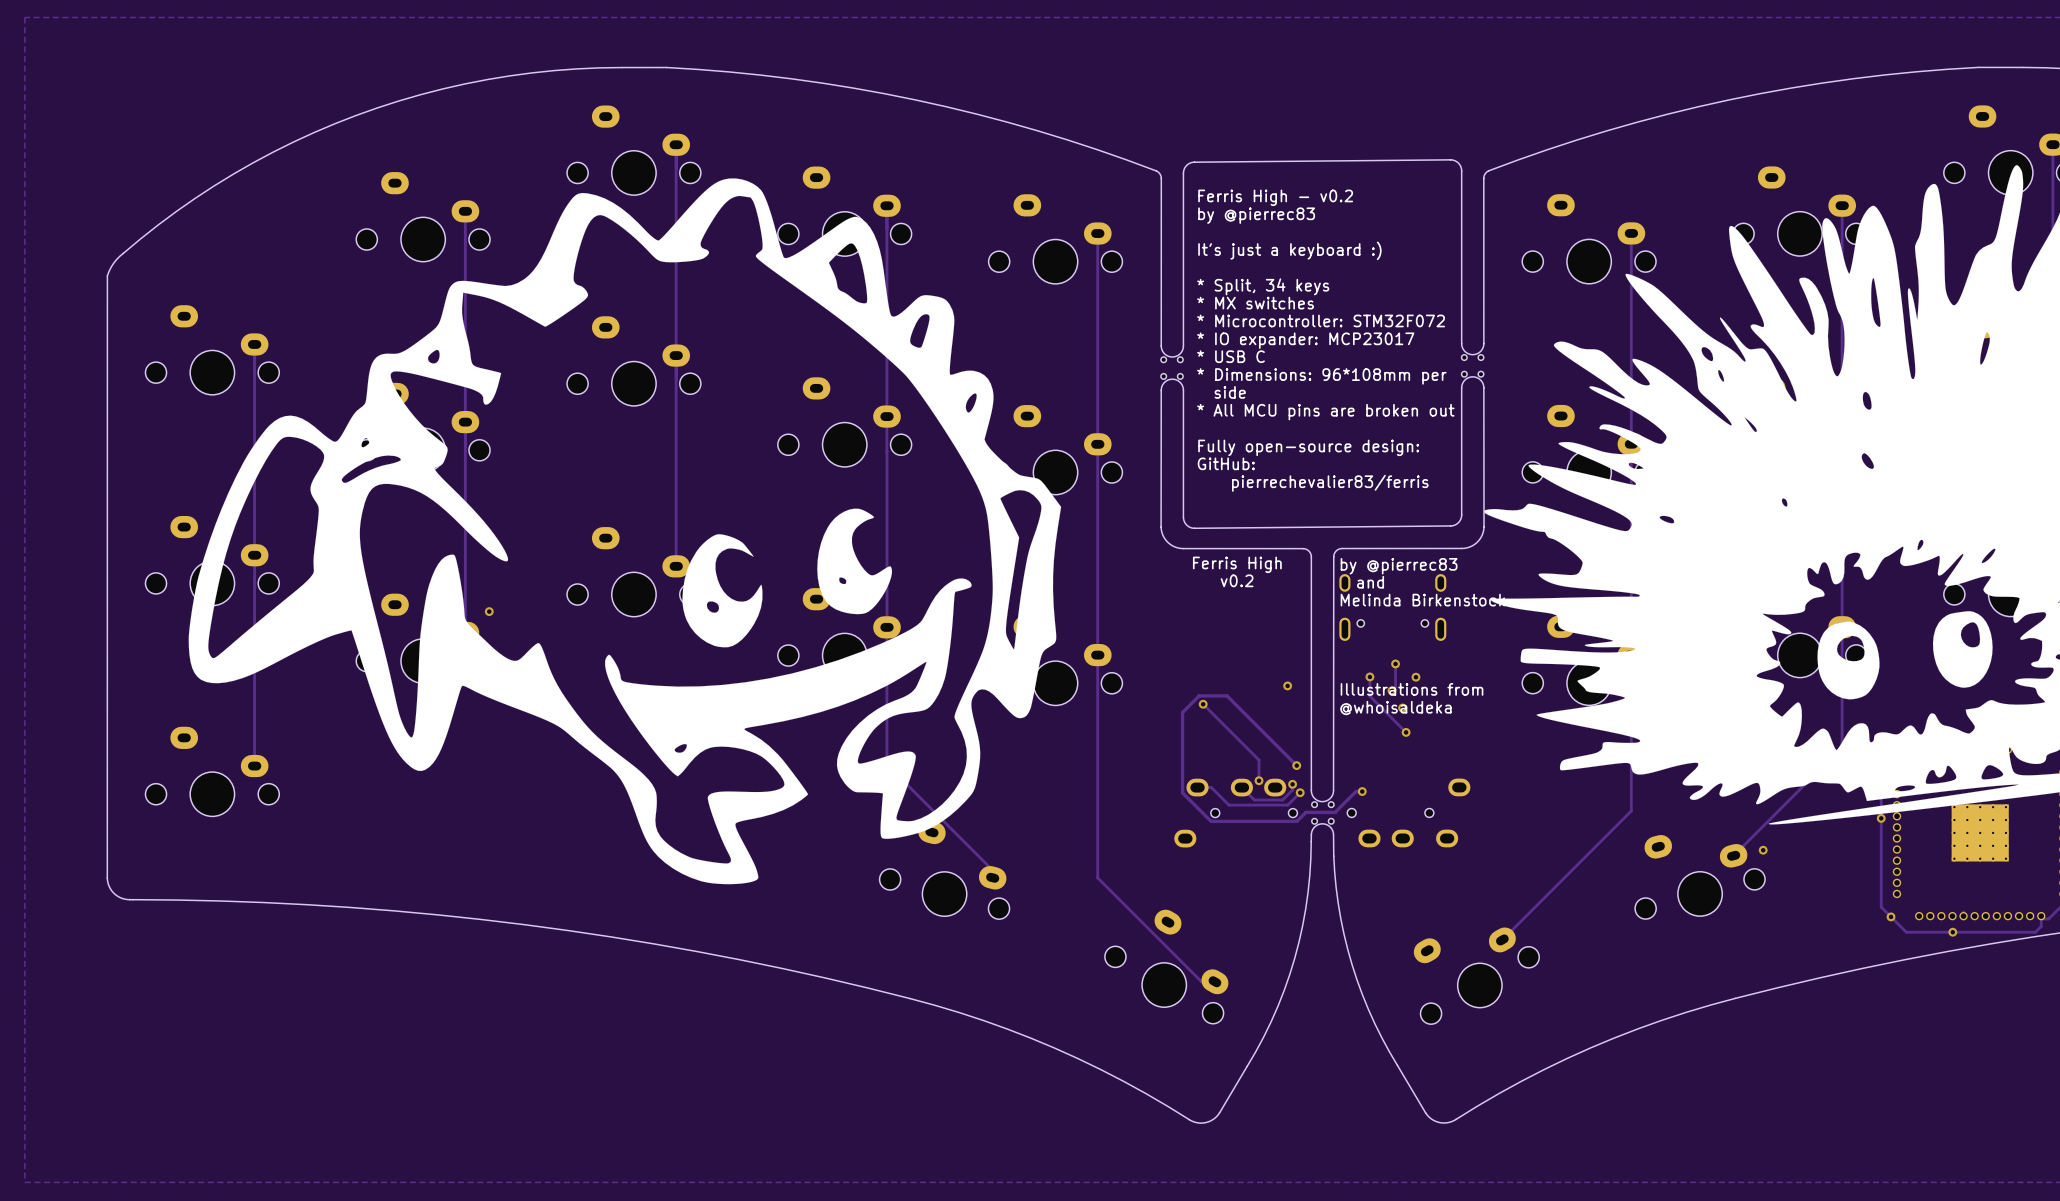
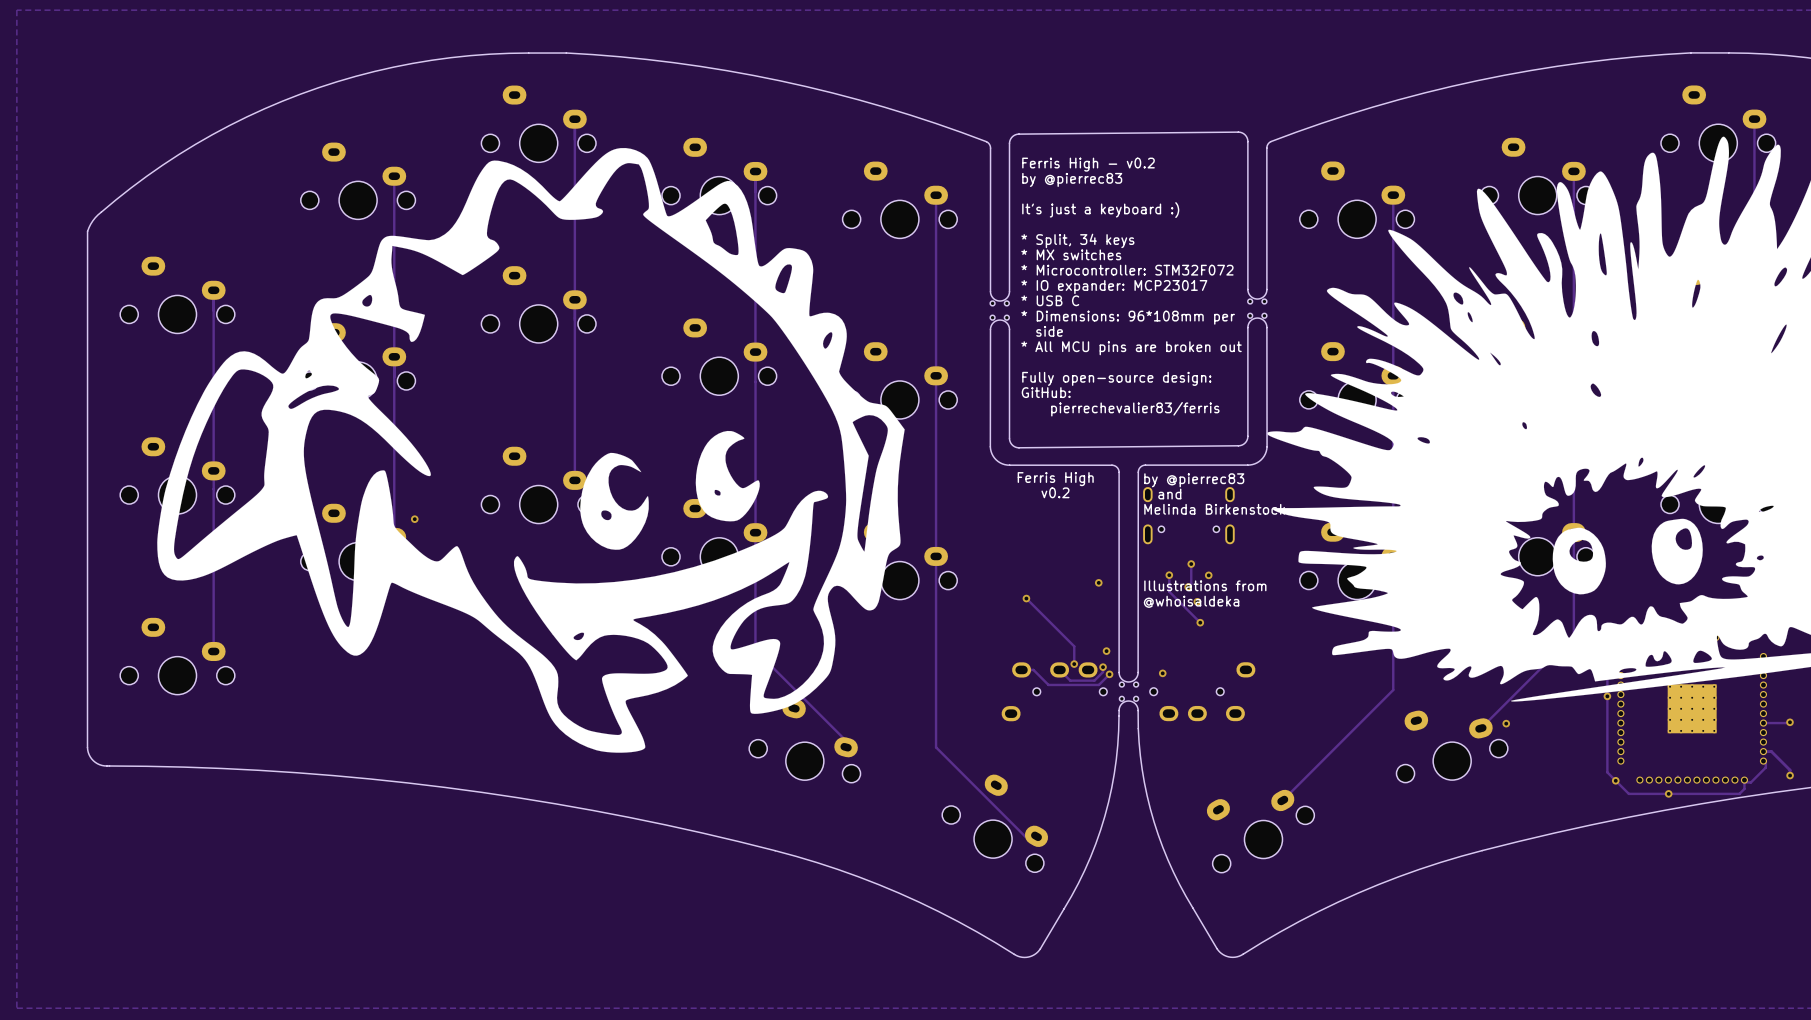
track: (1296, 765) (1227, 695) (1199, 695) (1182, 712) (1182, 792) (1211, 821) (1296, 821) (1305, 812) (1335, 812) (1355, 791) (1362, 791) -> none

